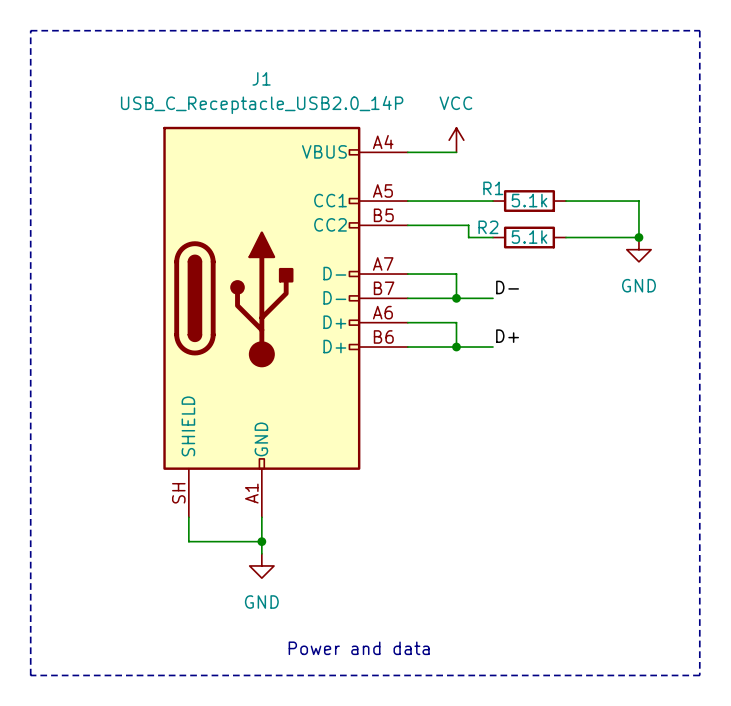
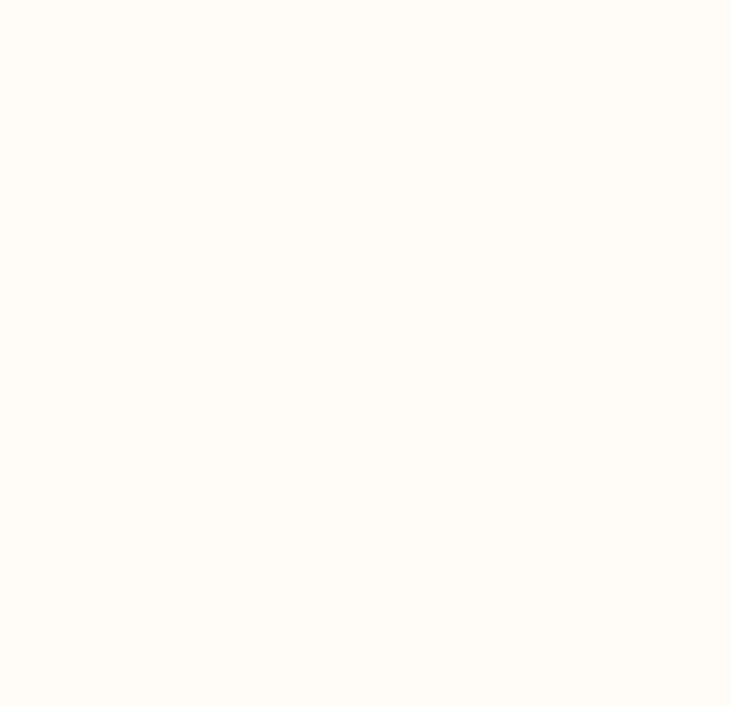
line: (30, 30) (699, 30) (699, 675) (30, 675) (30, 30) -> none
power symbol: VCC (456, 140) -> none
wire: (407, 152) (456, 152) -> none
wire: (407, 201) (492, 201) -> none
R1: 5.1k (529, 201) -> none
wire: (565, 201) (638, 201) (638, 237) (565, 237) -> none
wire: (407, 225) (468, 225) (468, 237) (492, 237) -> none
R2: 5.1k (529, 237) -> none
junction: (638, 237) -> none
power symbol: GND (638, 249) -> none
wire: (407, 274) (456, 274) (456, 298) -> none
label: D- (507, 287) -> none
wire: (407, 298) (492, 298) -> none
junction: (456, 298) -> none
J1: USB_C_Receptacle_USB2.0_14P (285, 322) -> none
wire: (407, 322) (456, 322) (456, 347) -> none
label: D+ (507, 336) -> none
wire: (407, 347) (492, 347) -> none
junction: (456, 347) -> none
wire: (188, 517) (188, 541) (261, 541) -> none
wire: (261, 517) (261, 553) -> none
junction: (261, 541) -> none
power symbol: GND (261, 565) -> none
text: Power and data (359, 648) -> none

